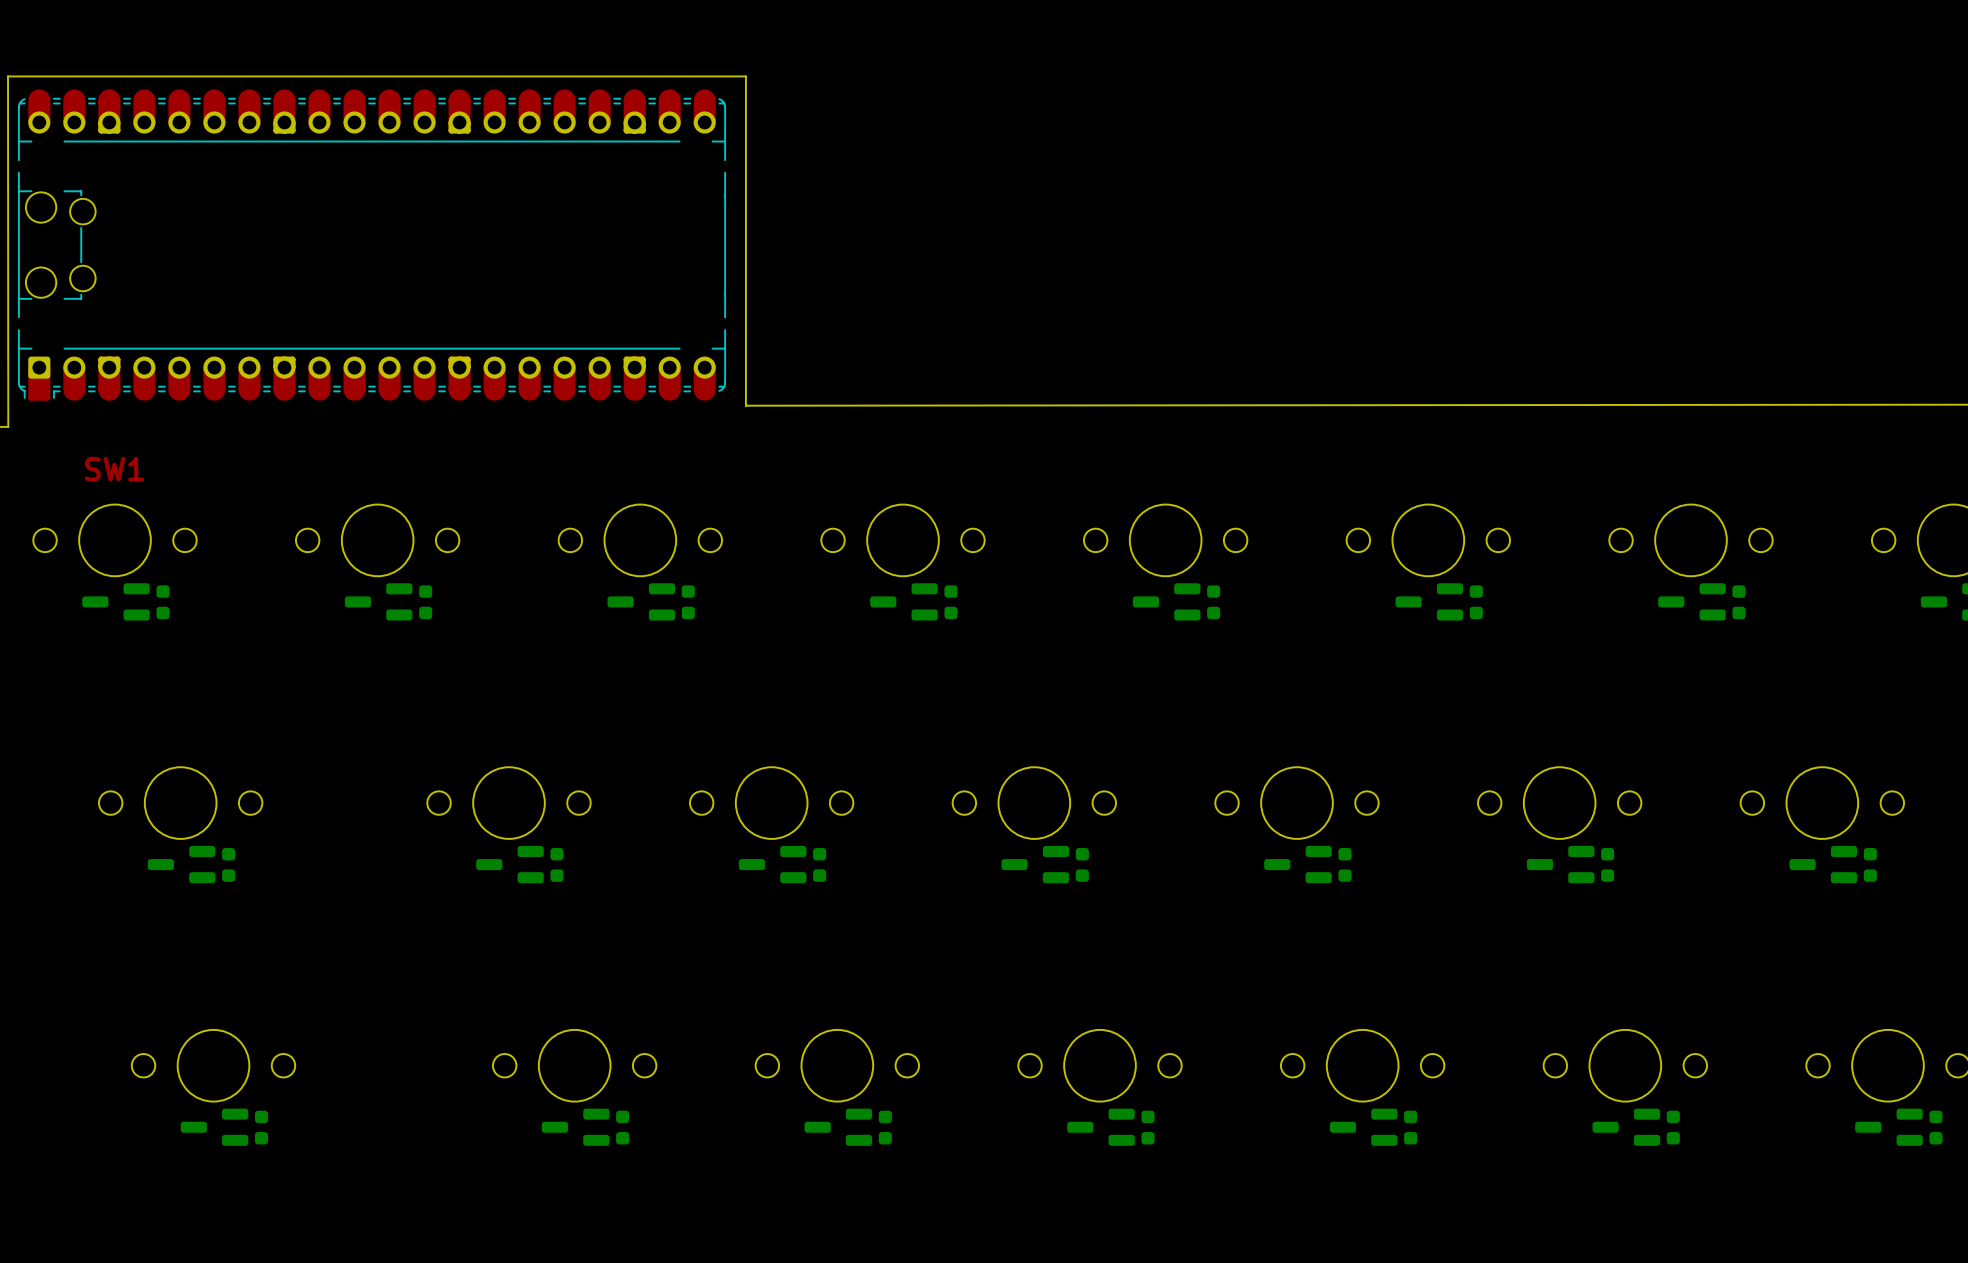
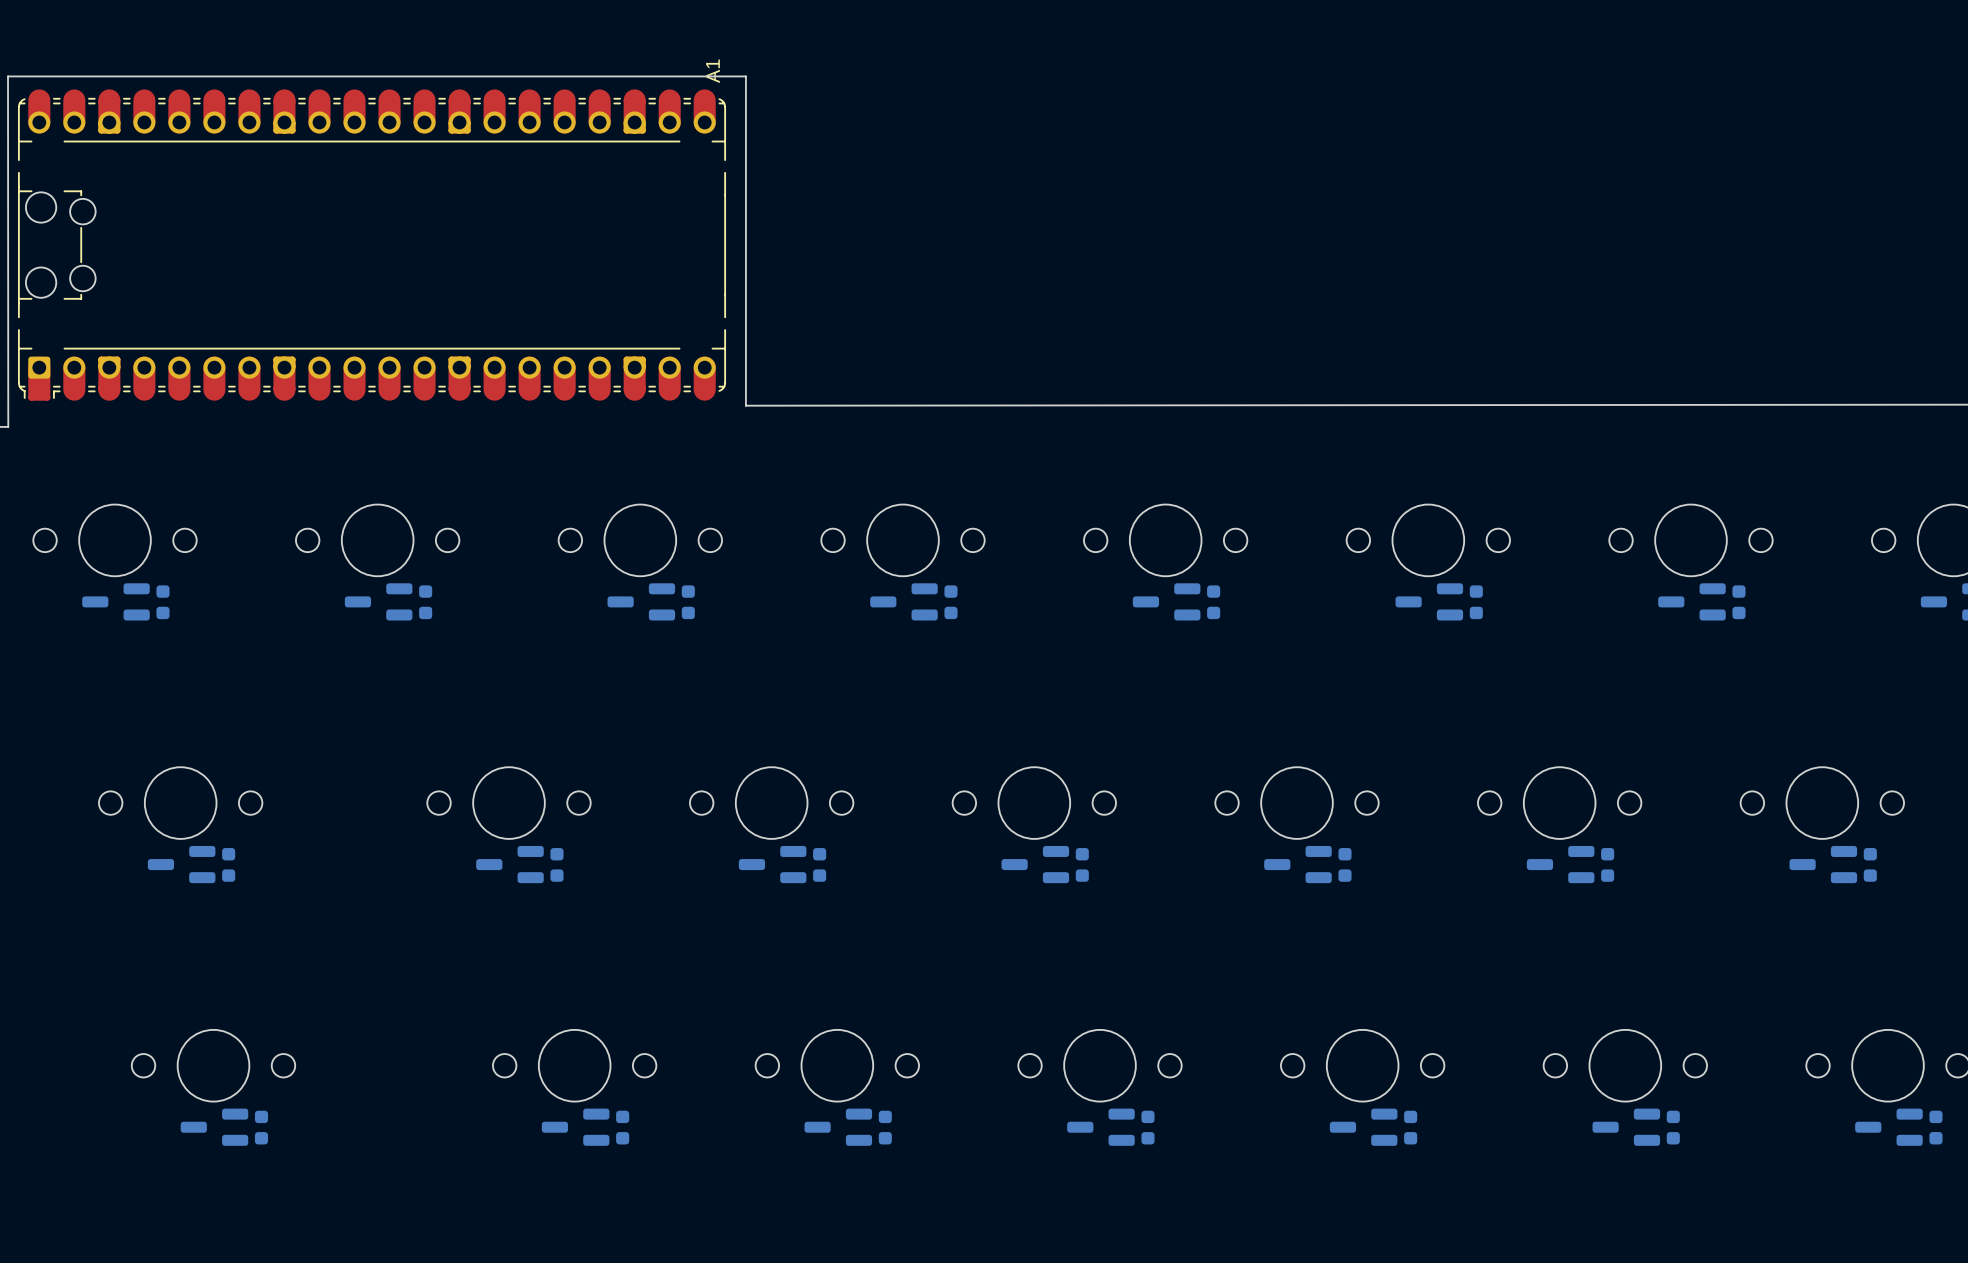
A1 name: none -> A1 (712, 71)
text: SW1 (114, 469) -> none

